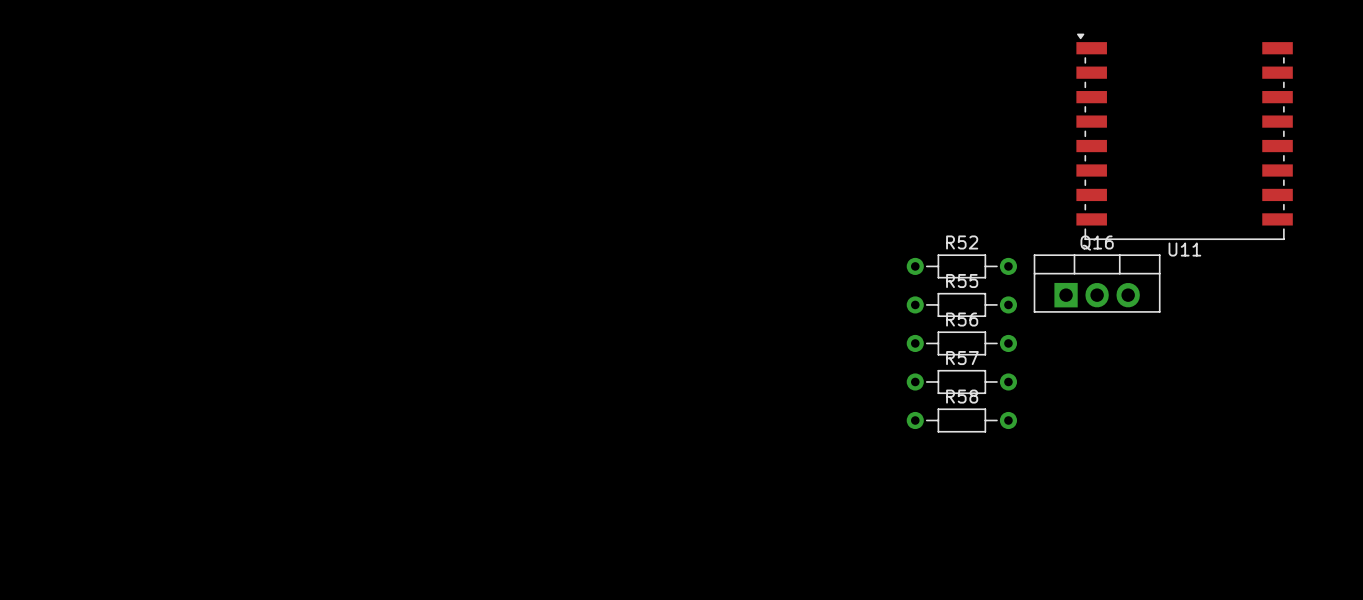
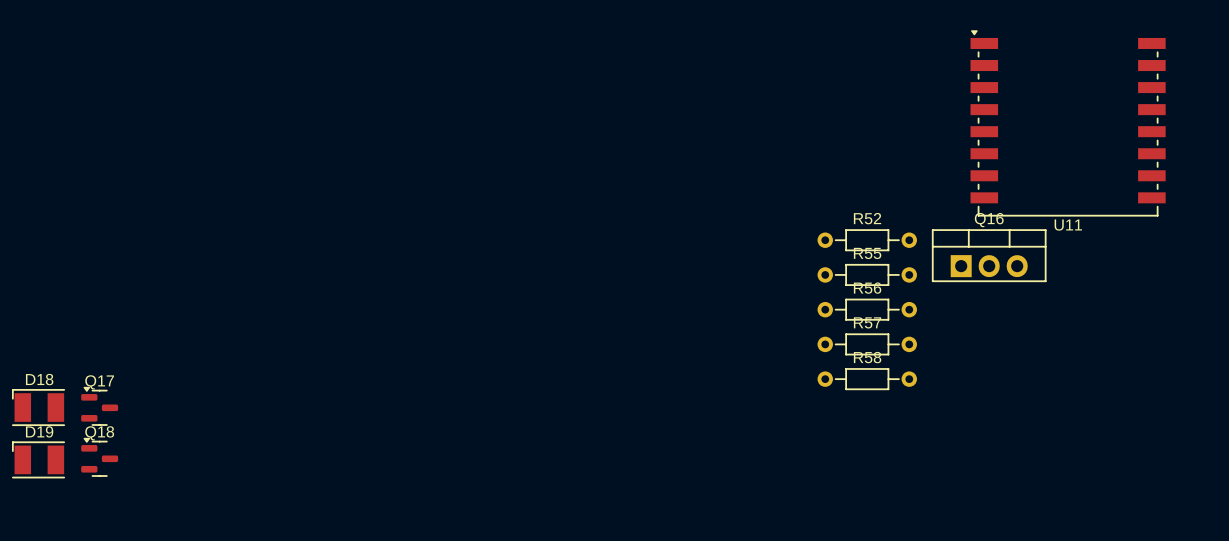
Q17: none -> (99, 406)
D18: none -> (38, 407)
Q18: none -> (99, 457)
D19: none -> (38, 459)

